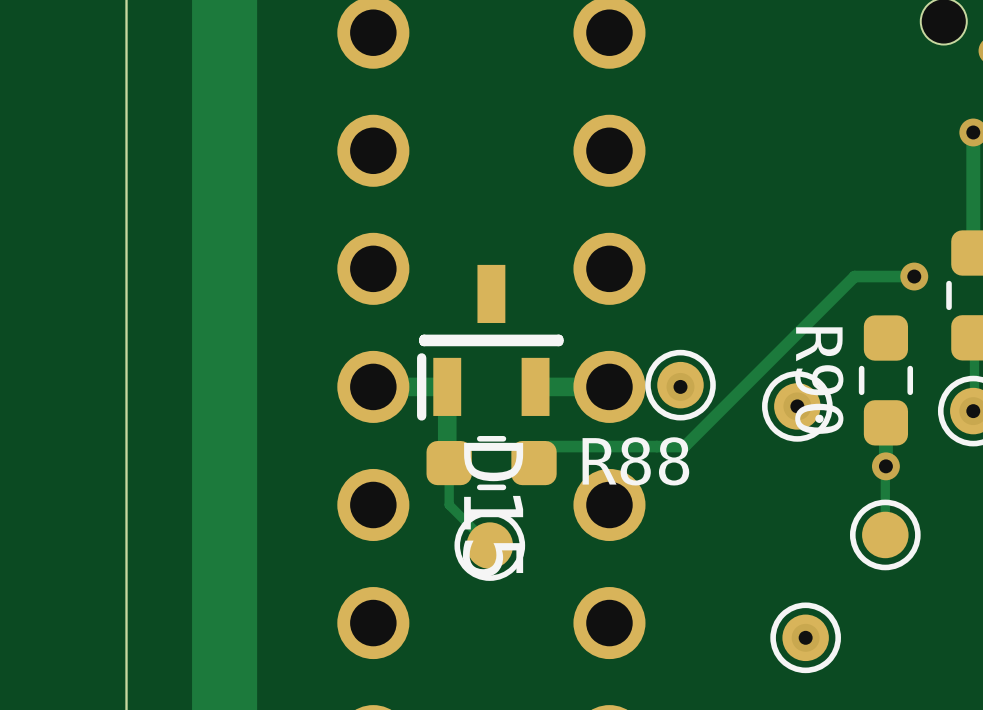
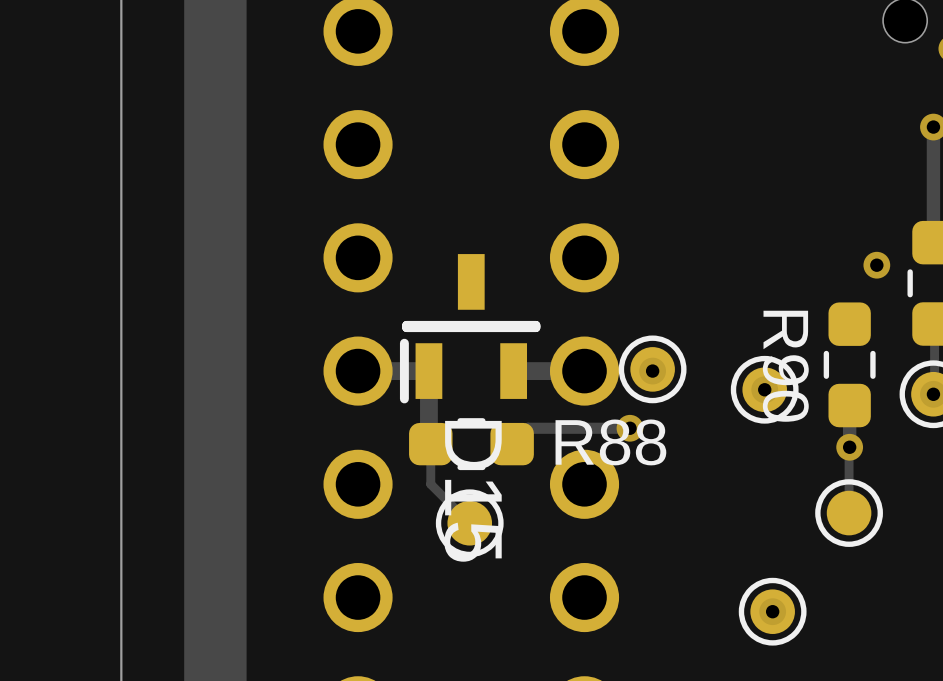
track: (914, 276) (854, 276) (684, 446) (656, 446) -> none
via: none -> (629, 428)

